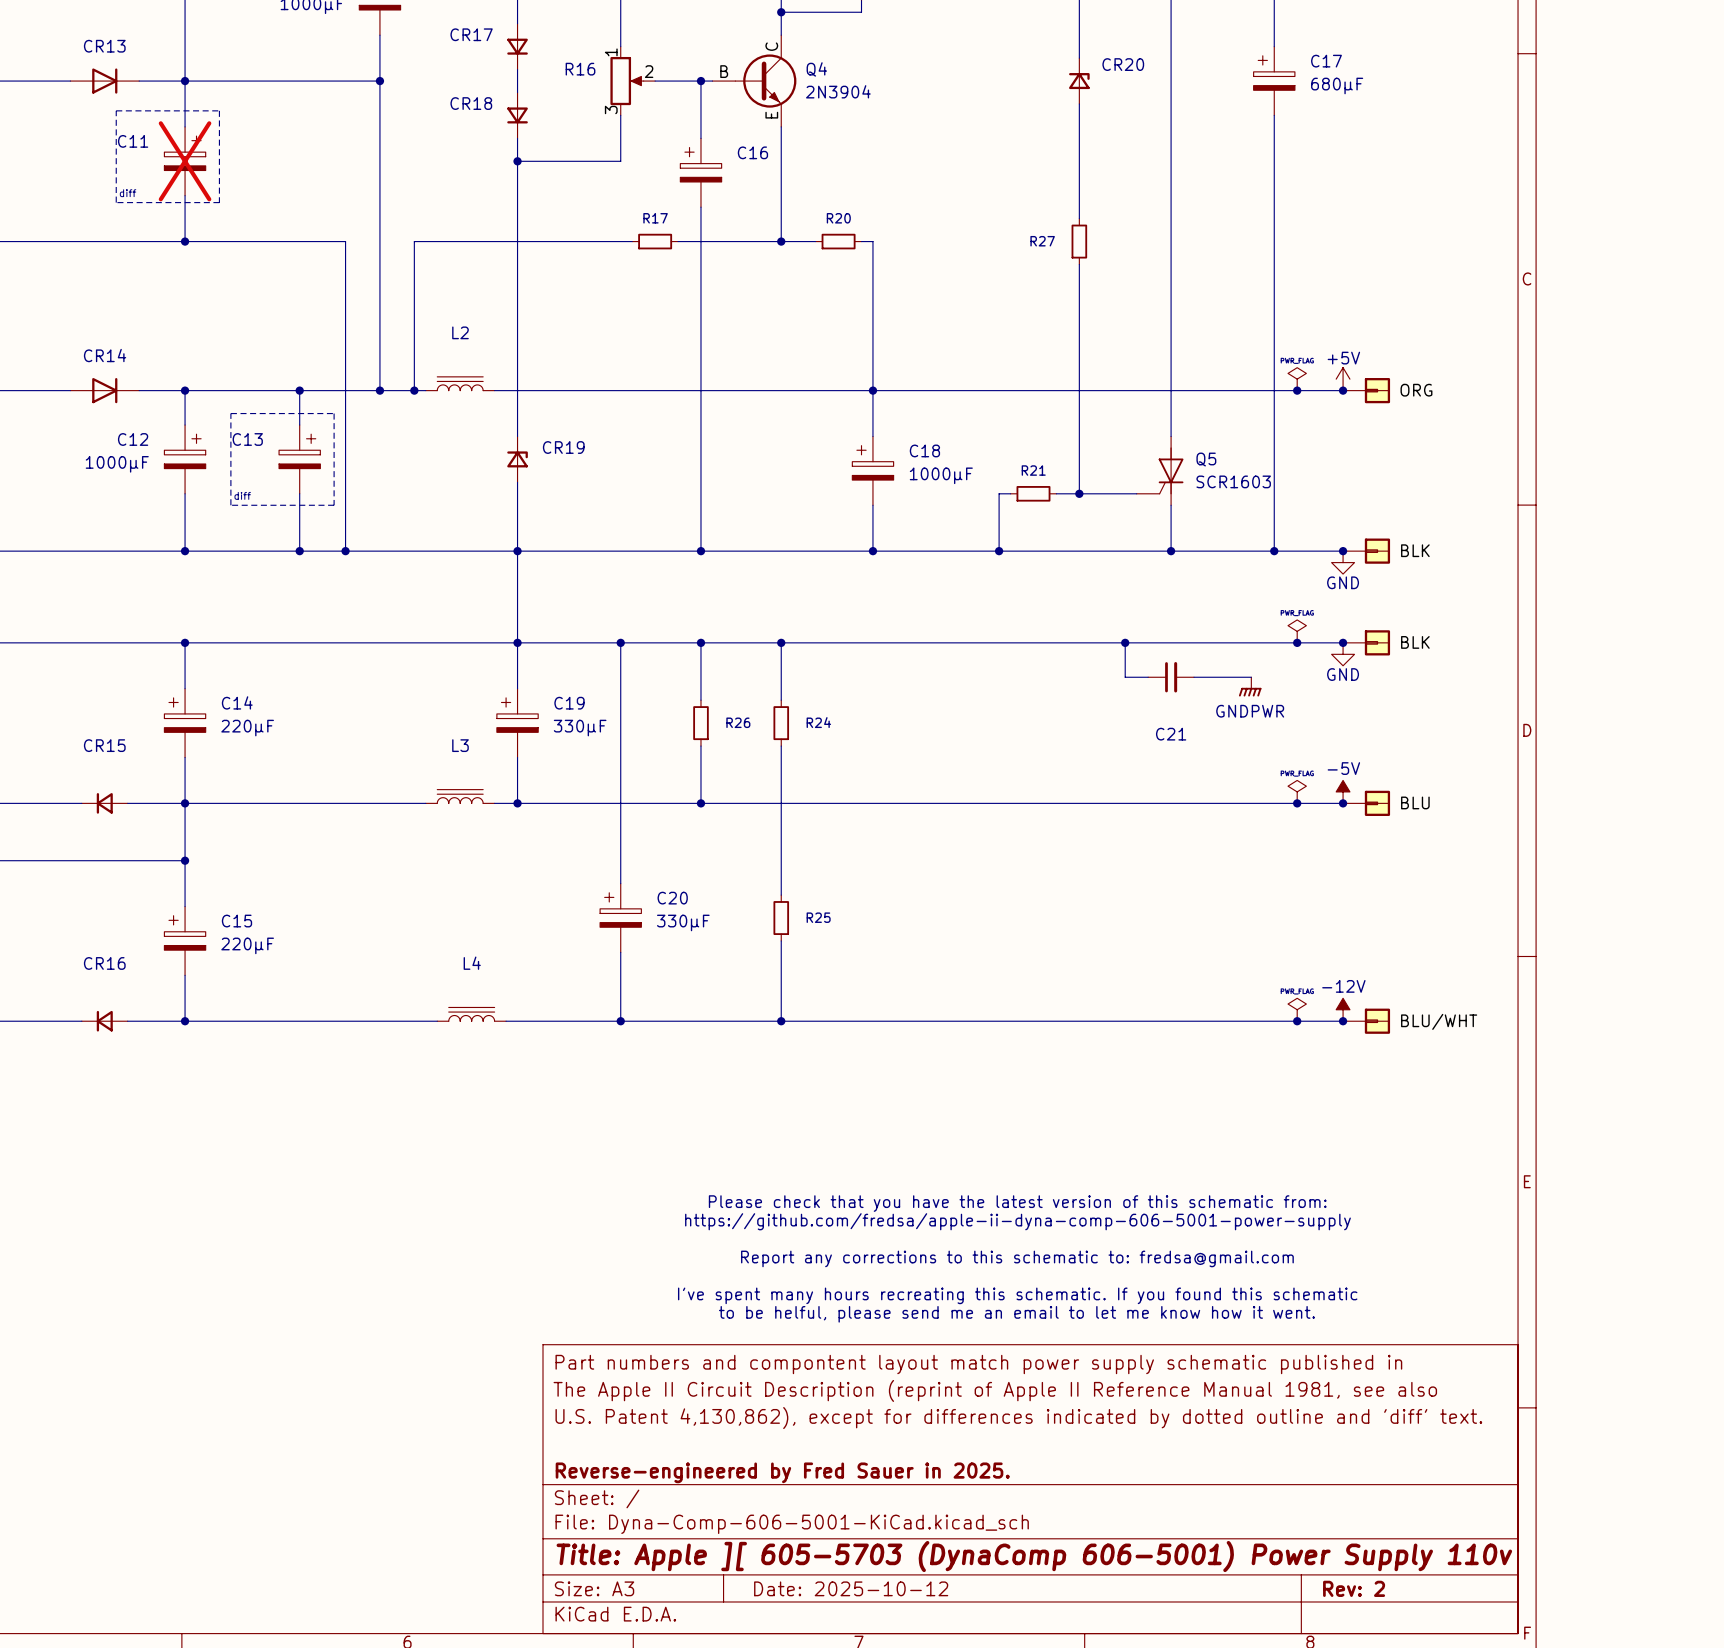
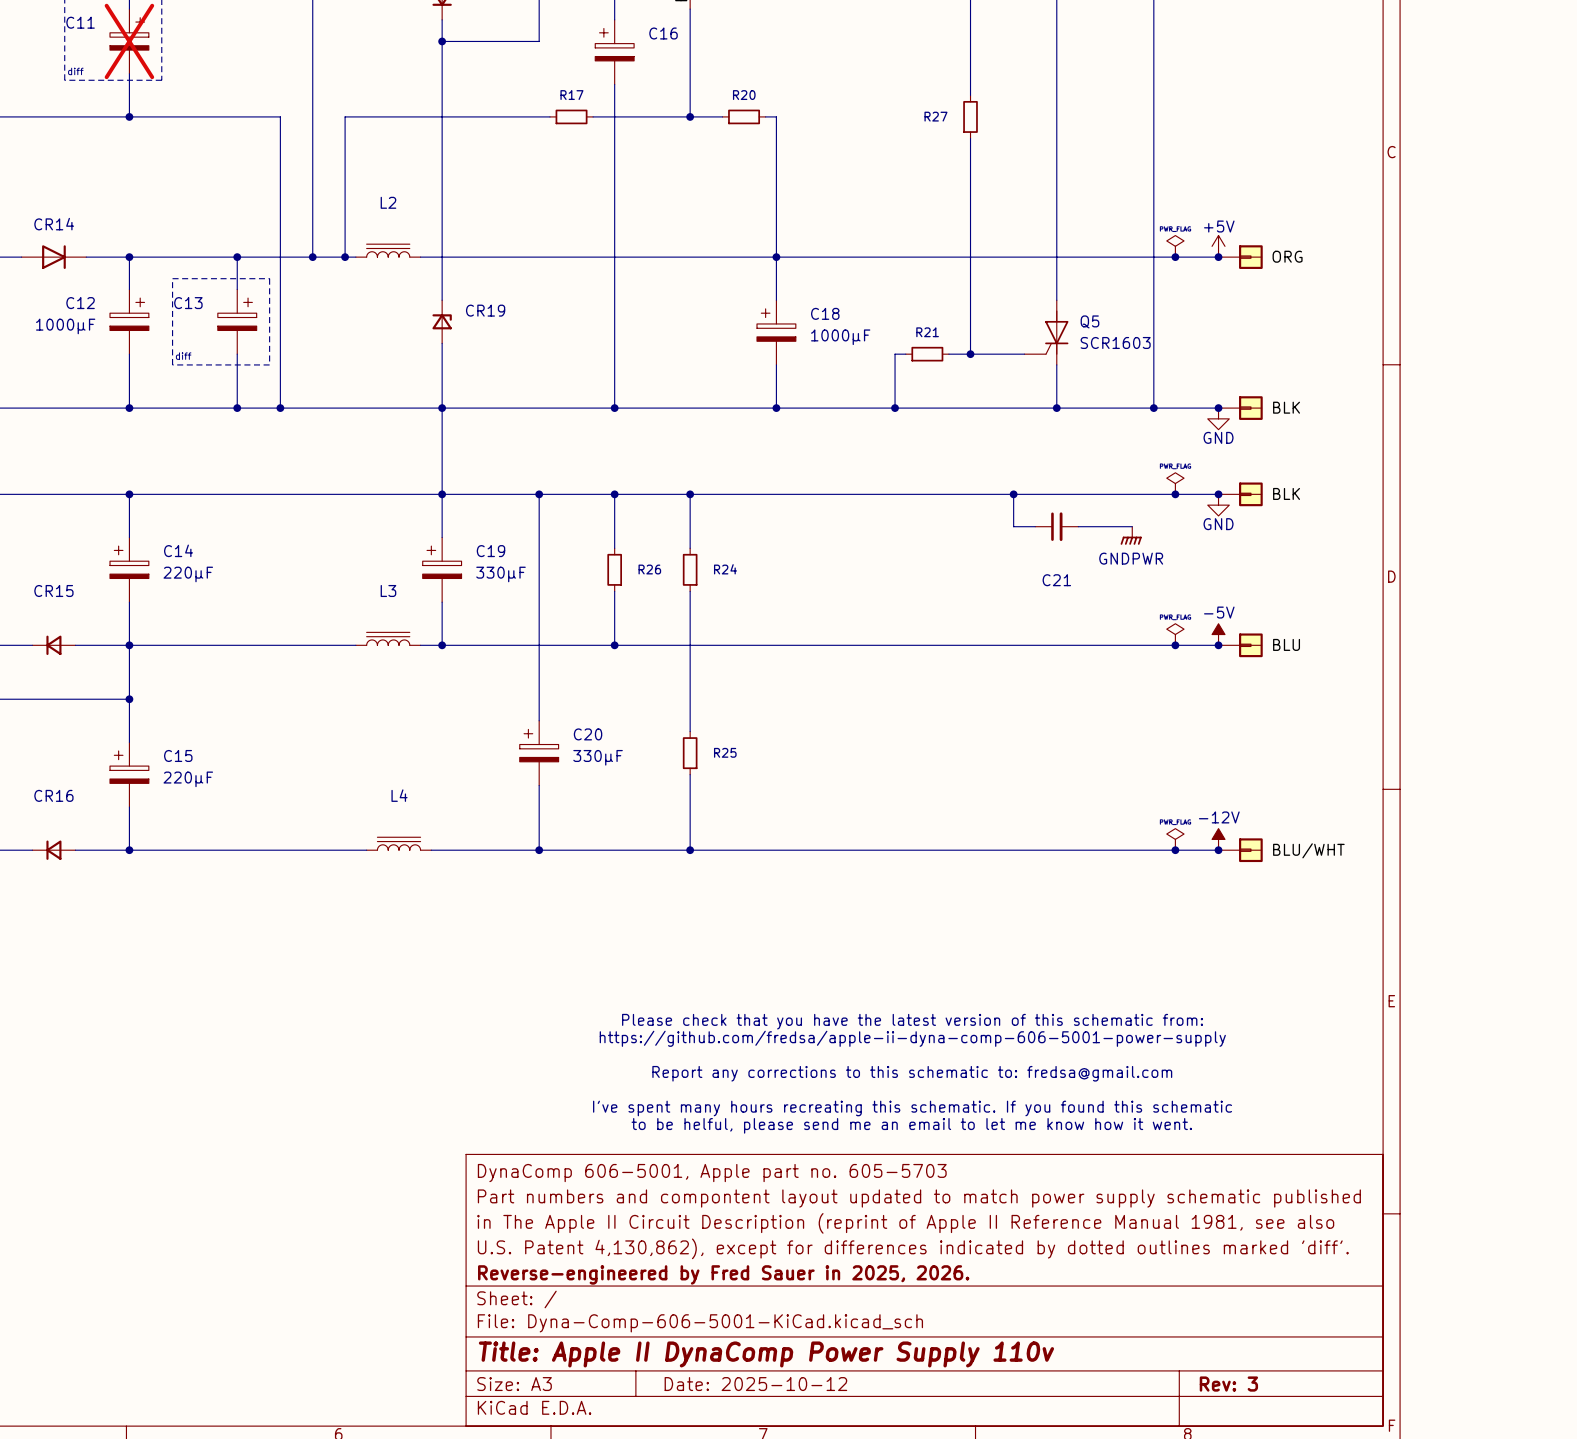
title block: Part numbers and compontent layout match power supply schematic published in (978, 1364) -> DynaComp 606-5001, Apple part no. 605-5703 (712, 1173)
title block: The Apple II Circuit Description (reprint of Apple II Reference Manual 1981, see also (995, 1390) -> Part numbers and compontent layout updated to match power supply schematic published (919, 1198)
title block: U.S. Patent 4,130,862), except for differences indicated by dotted outline and 'diff' text. (1018, 1418) -> in The Apple II Circuit Description (reprint of Apple II Reference Manual 1981, see also (905, 1223)
title block: none -> U.S. Patent 4,130,862), except for differences indicated by dotted outlines marked 'diff'. (913, 1248)
title block: Reverse-engineered by Fred Sauer in 2025. (782, 1472) -> Reverse-engineered by Fred Sauer in 2025, 2026. (723, 1274)
title block: Title: Apple ][ 605-5703 (DynaComp 606-5001) Power Supply 110v (1034, 1556) -> Title: Apple II DynaComp Power Supply 110v (766, 1354)
title block: Rev: 2 (1354, 1588) -> Rev: 3 (1228, 1384)

